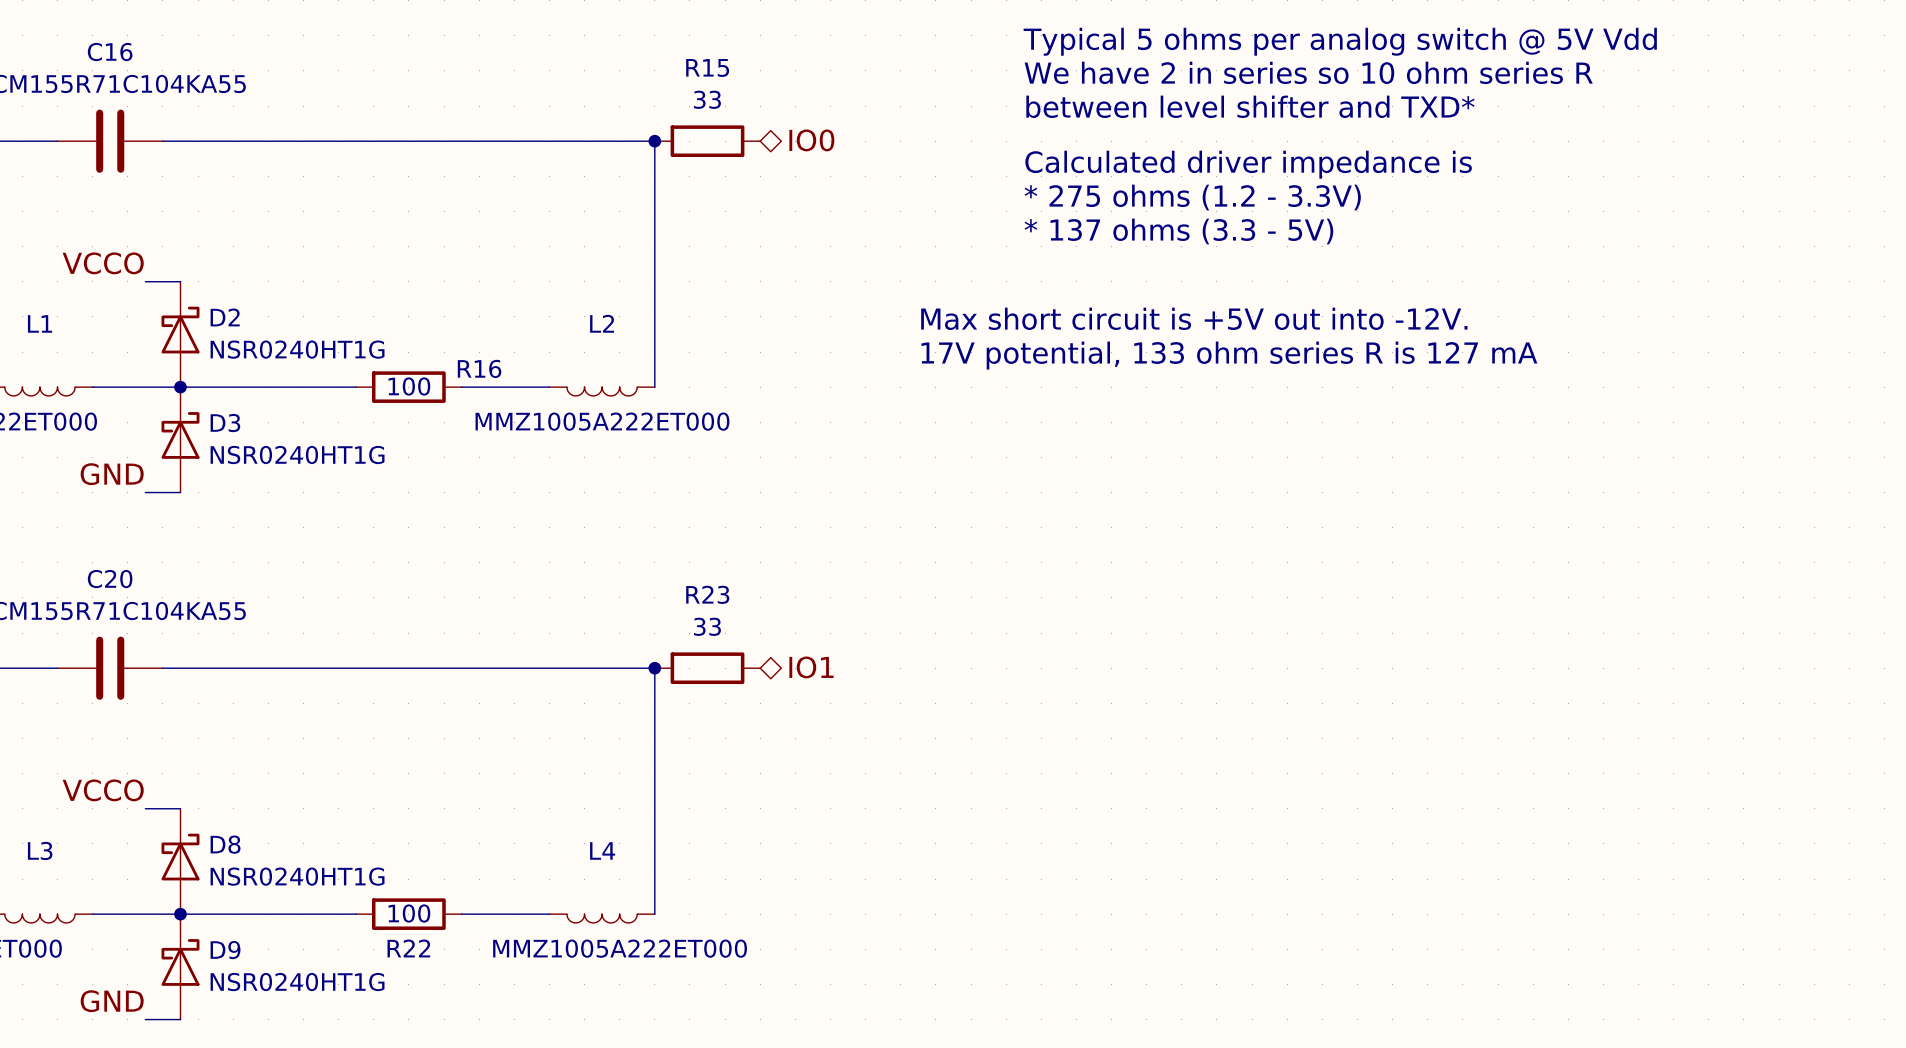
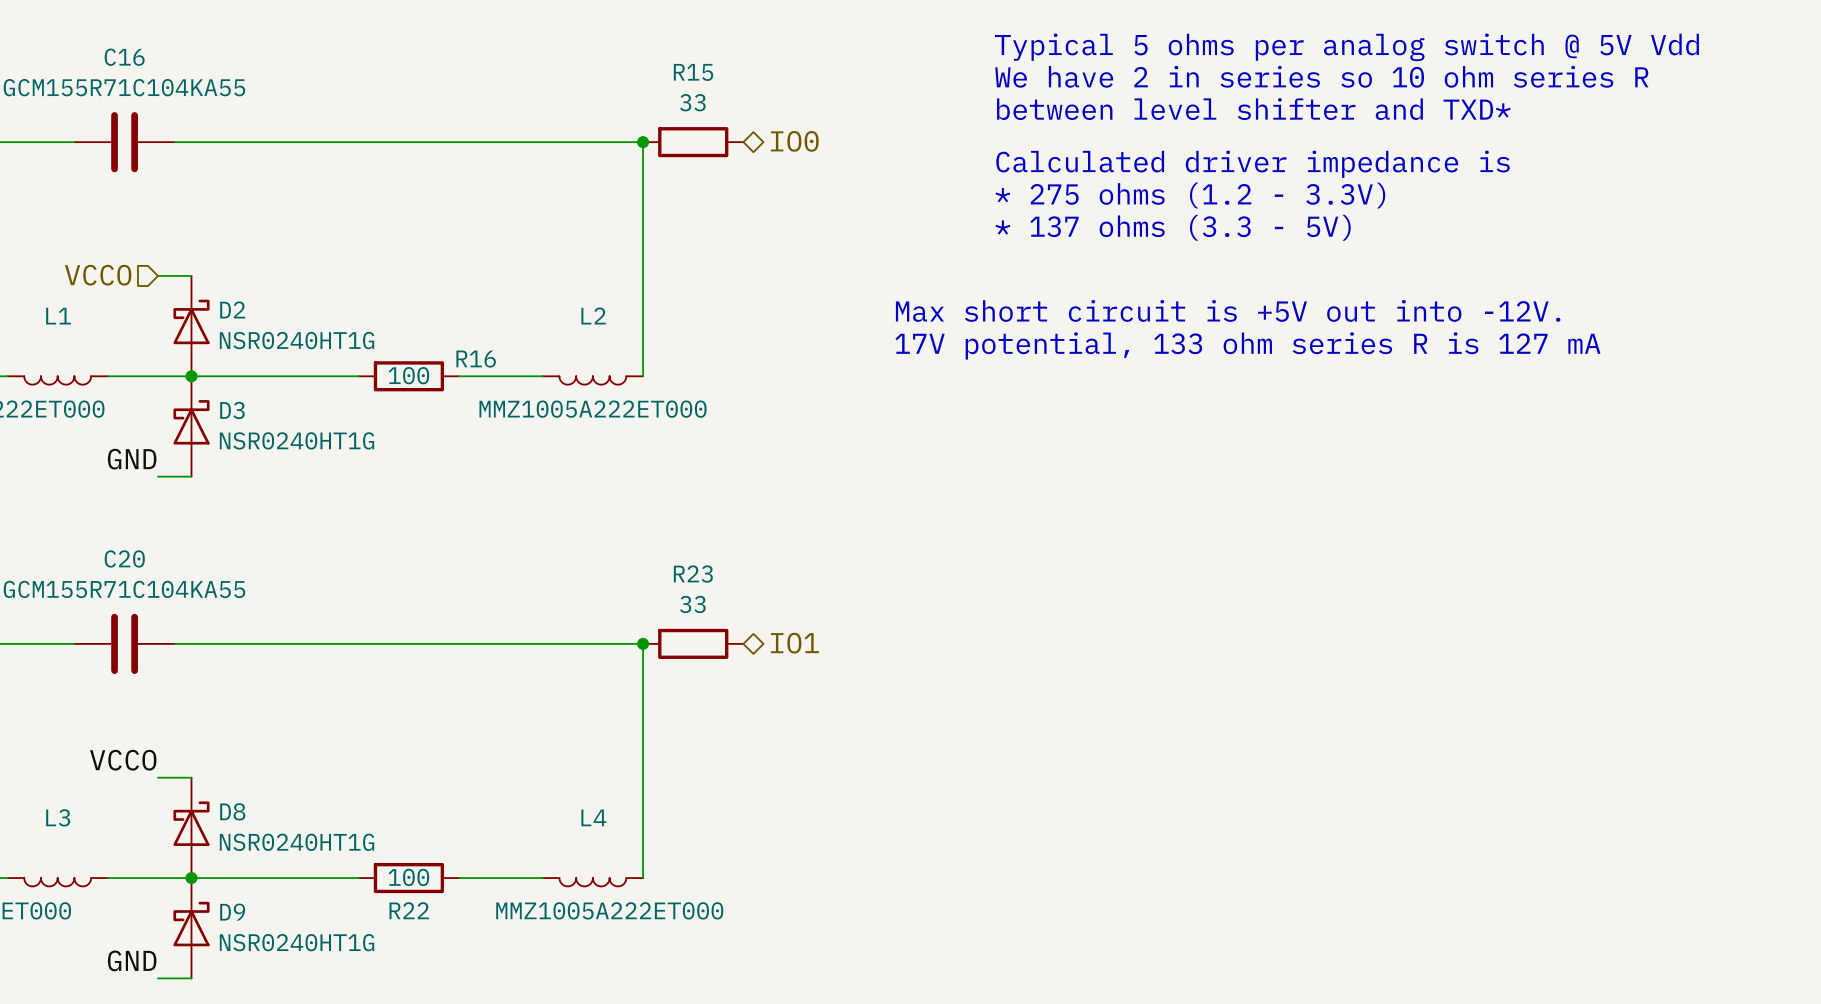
label: VCCO (103, 263) -> none
hierarchical label: none -> VCCO (98, 275)

